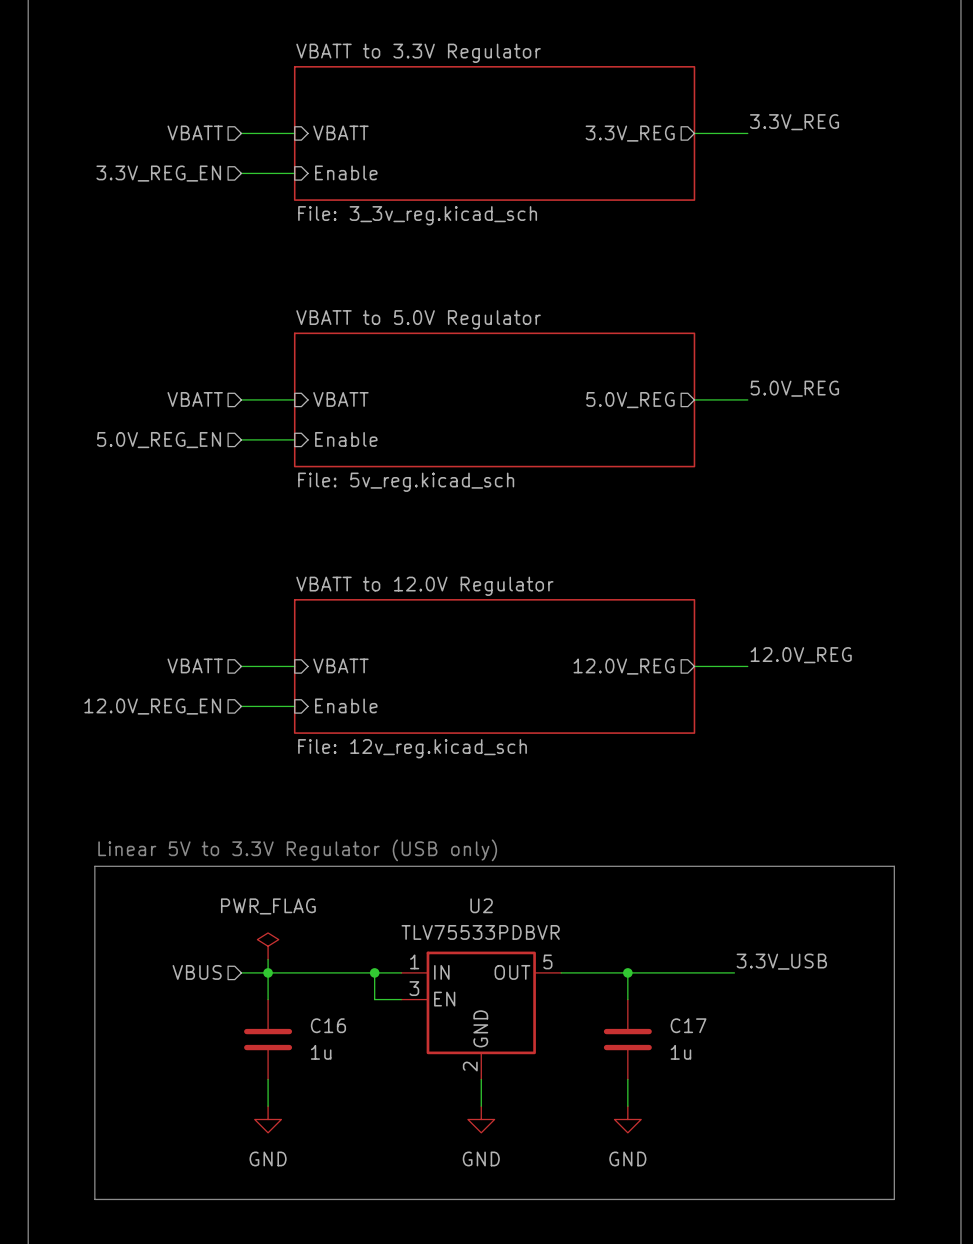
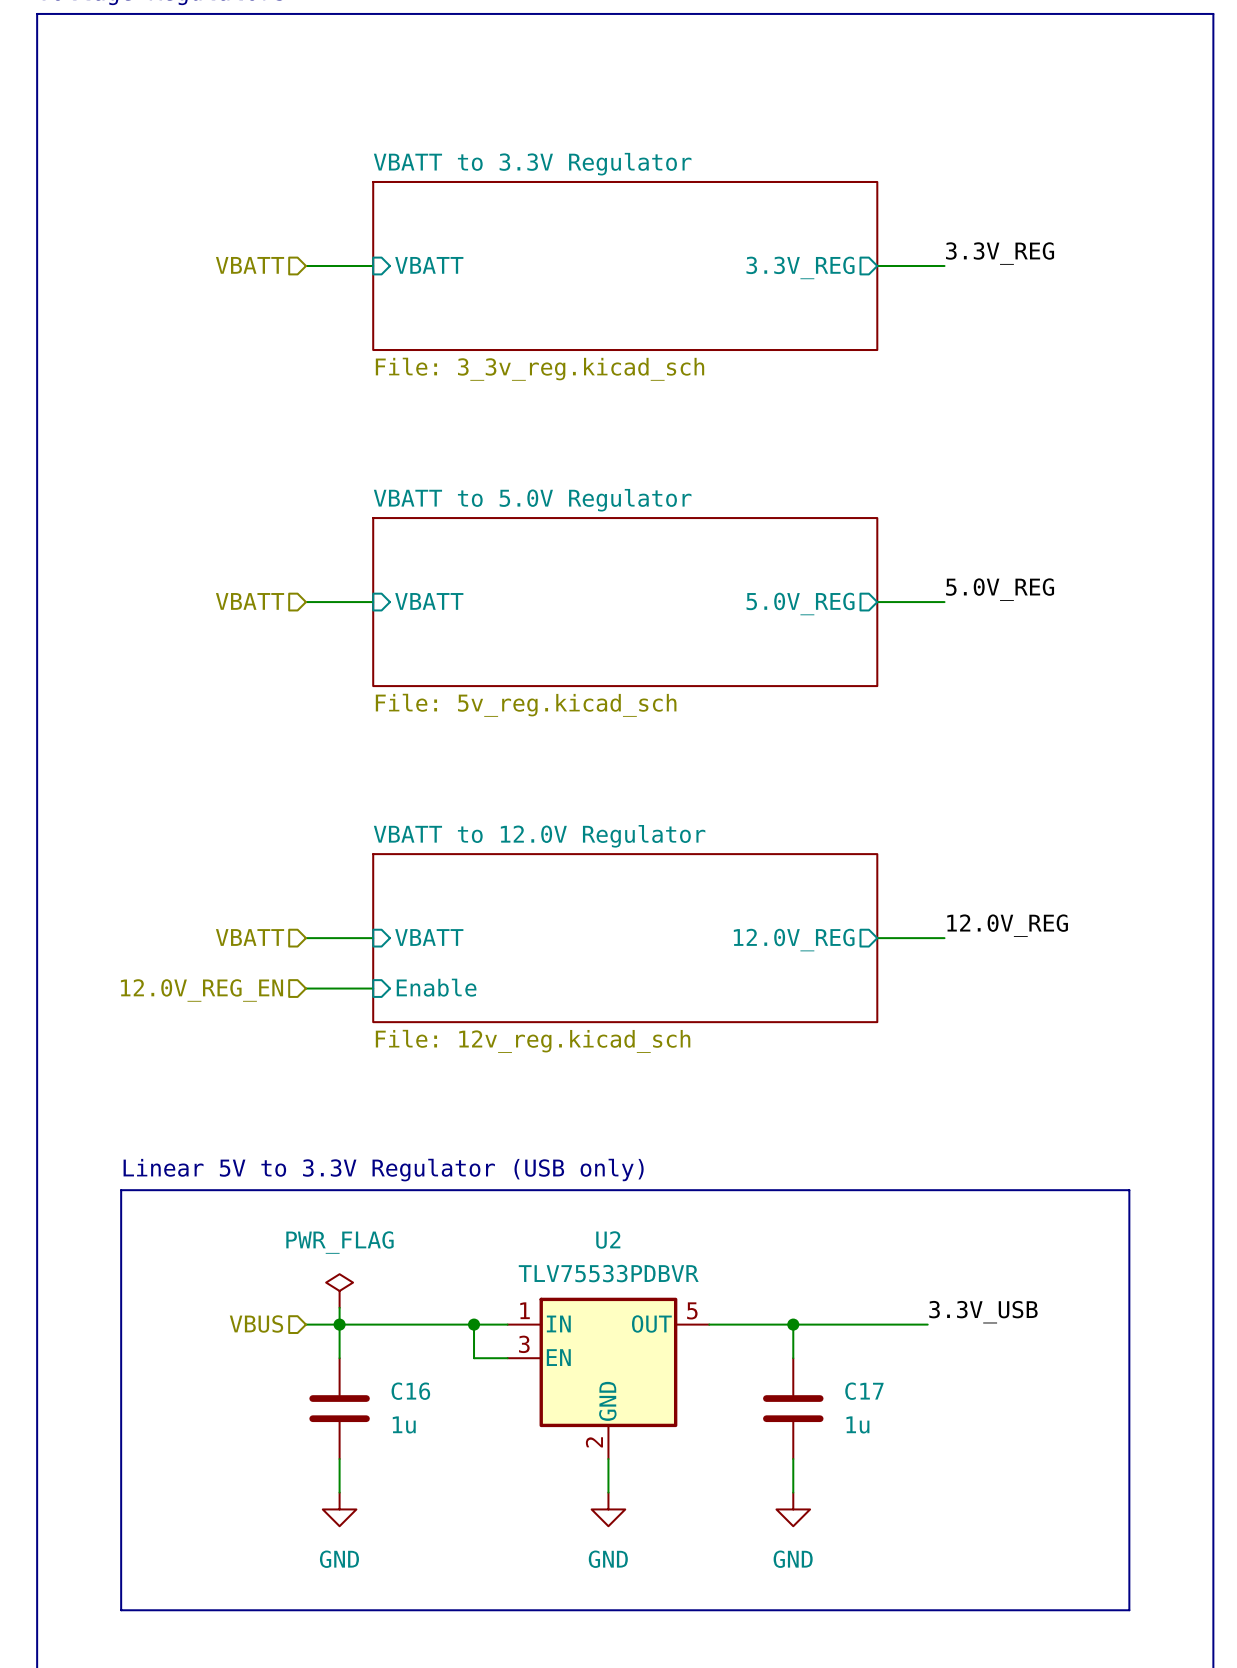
sheet pin: Enable (346, 172) -> none
hierarchical label: 3.3V_REG_EN (158, 173) -> none
wire: (241, 173) (294, 173) -> none
wire: (241, 439) (294, 439) -> none
sheet pin: Enable (346, 439) -> none
hierarchical label: 5.0V_REG_EN (159, 440) -> none

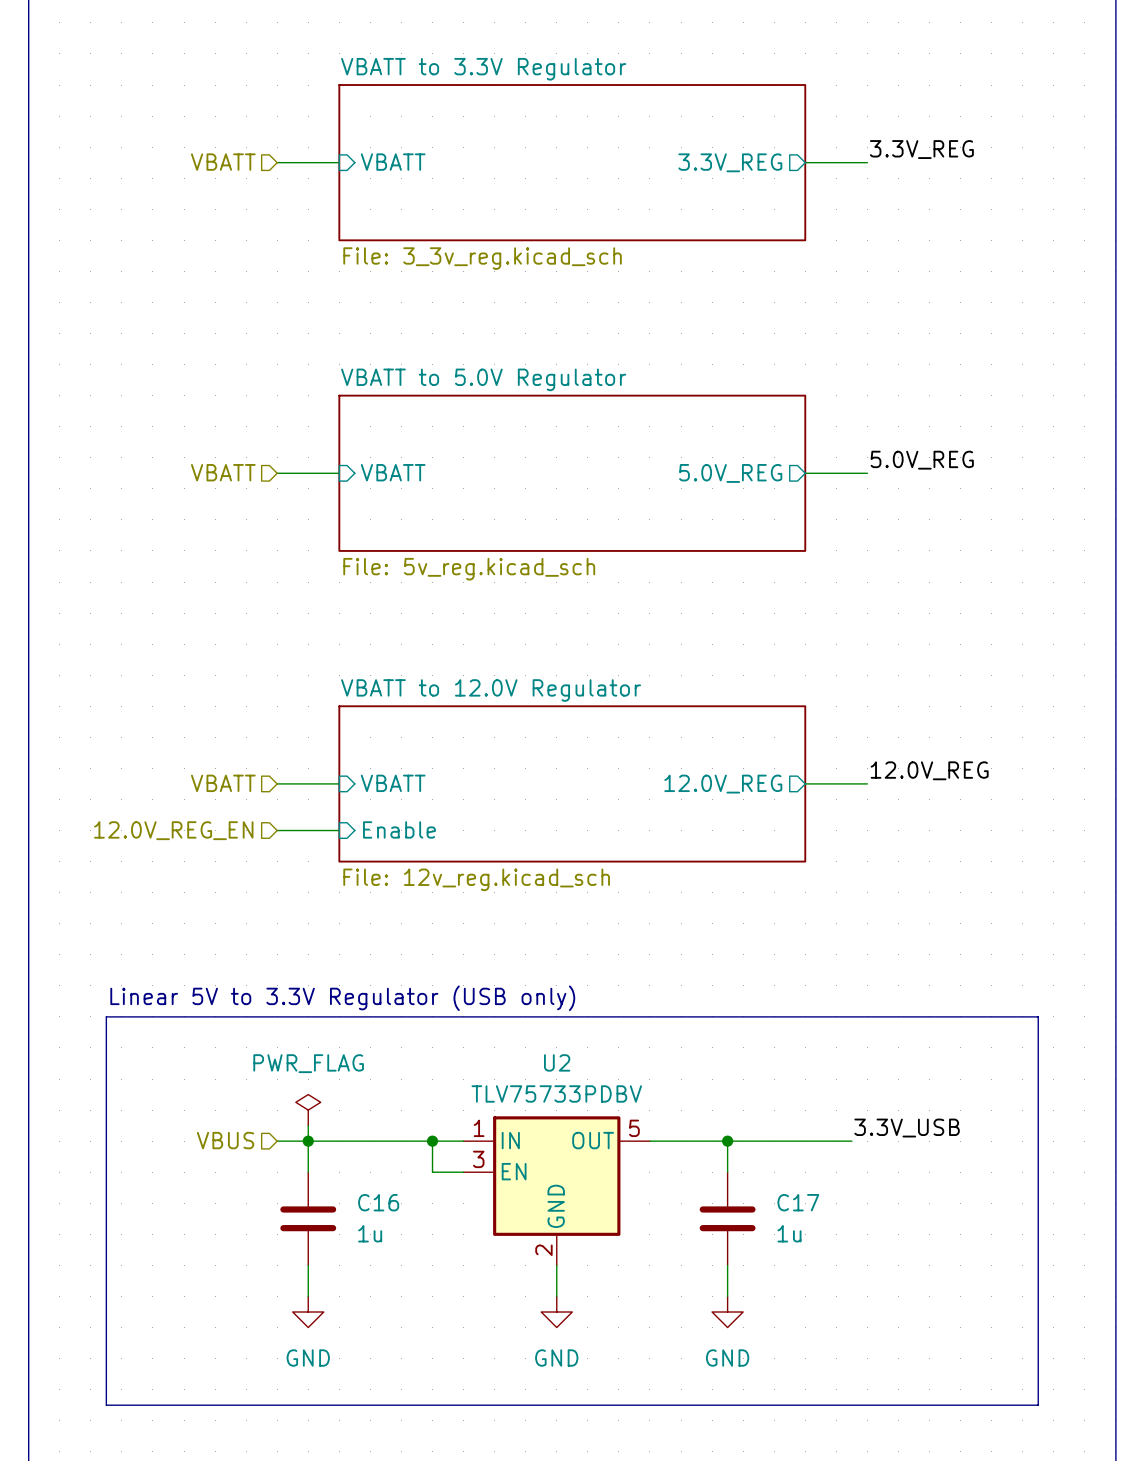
U2 value: TLV75533PDBVR (608, 1273) -> TLV75733PDBV (556, 1093)

